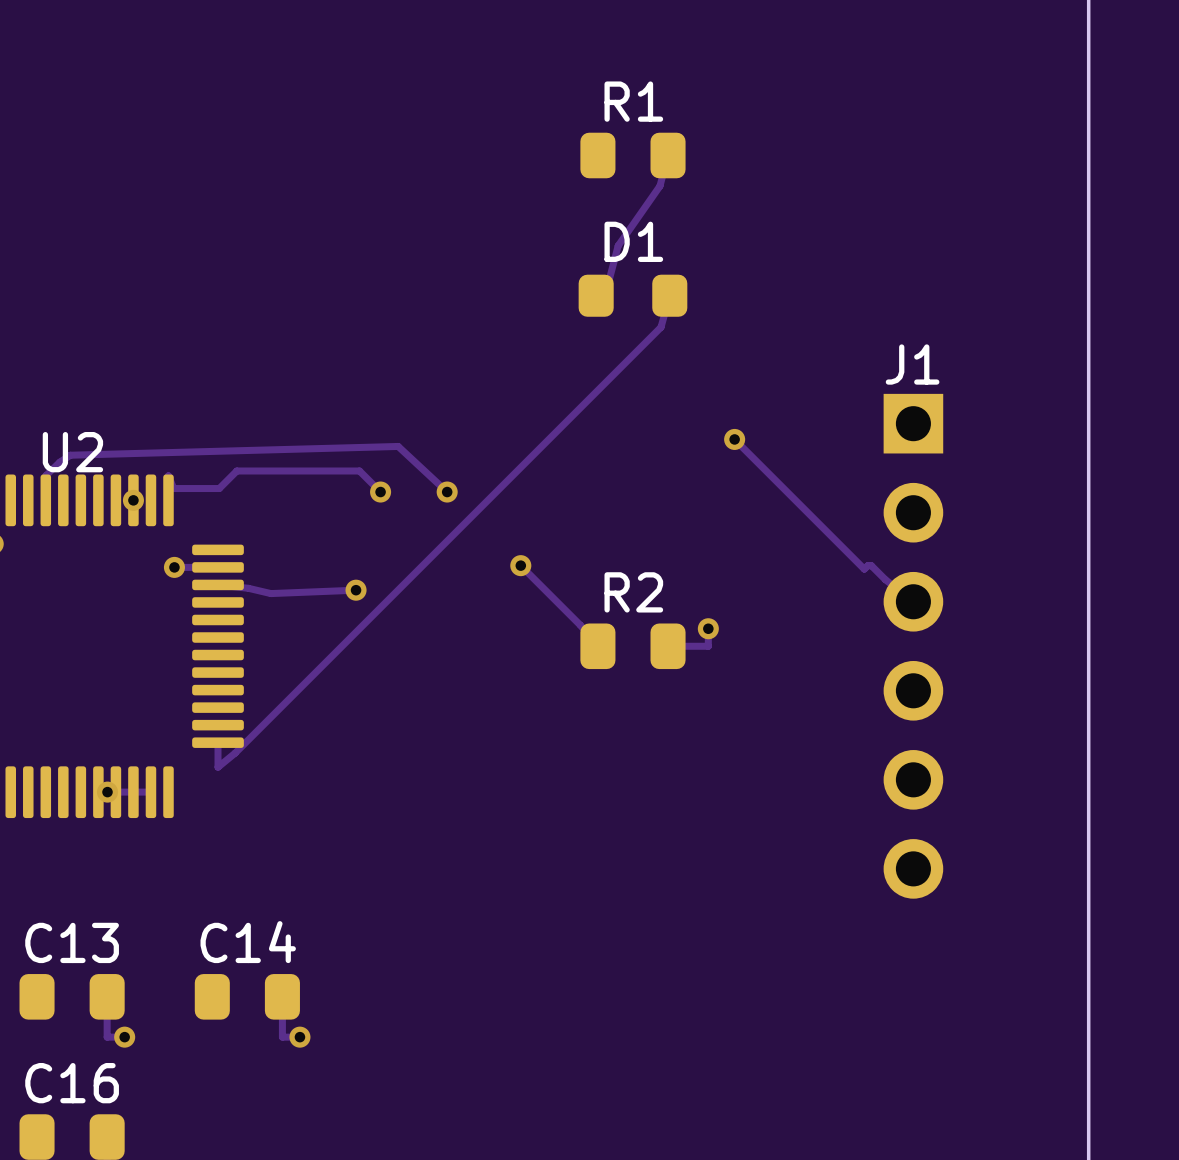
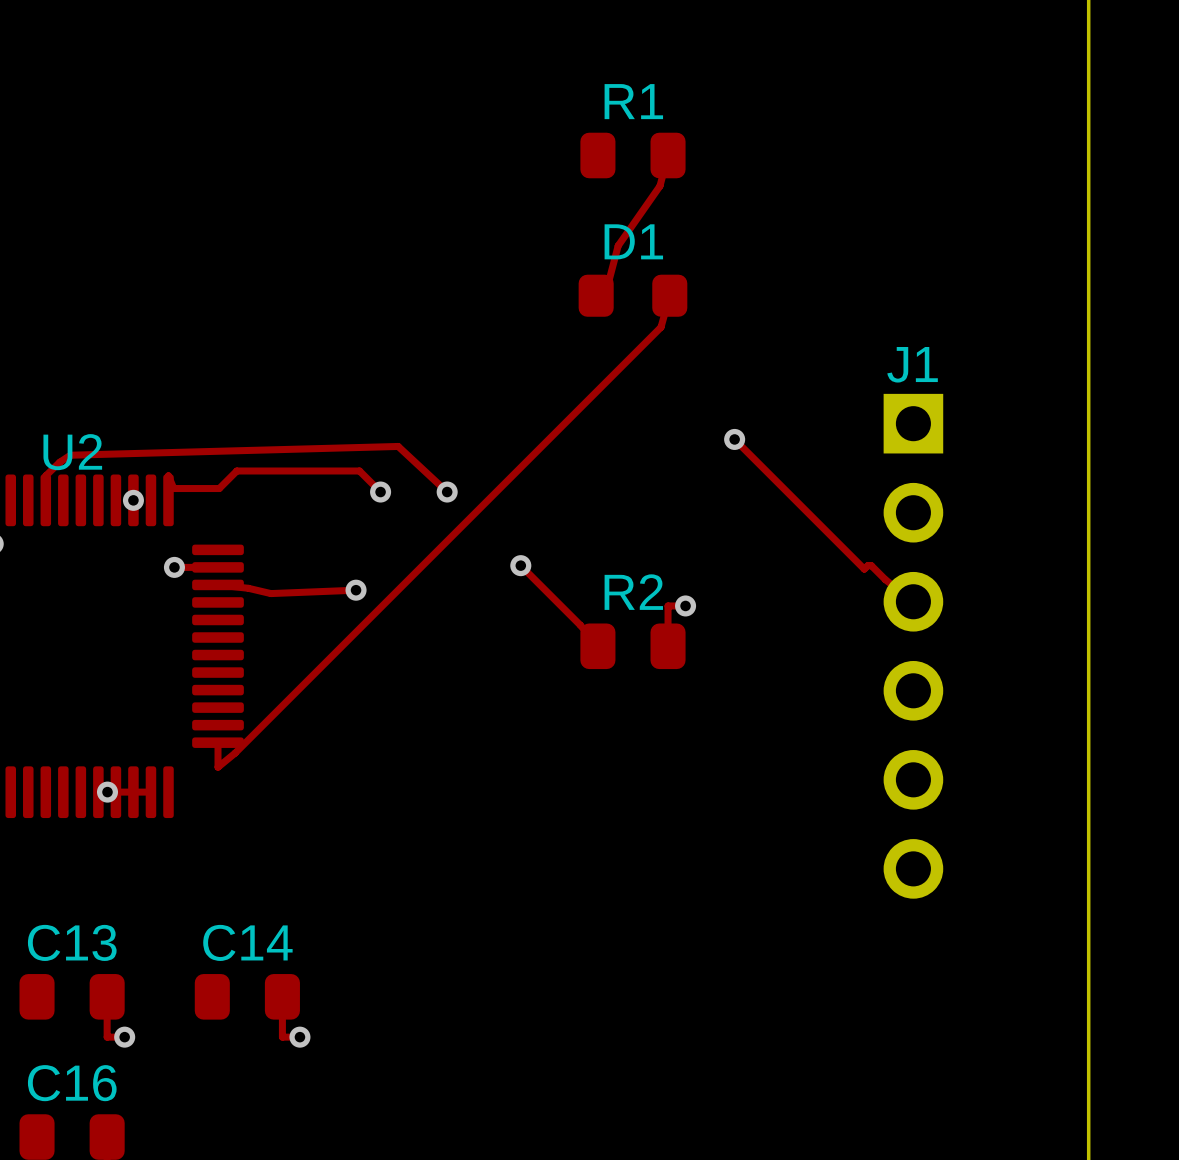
track: (708, 628) (708, 646) (668, 646) -> (685, 605) (668, 605) (668, 646)
via position: (708, 628) -> (685, 605)

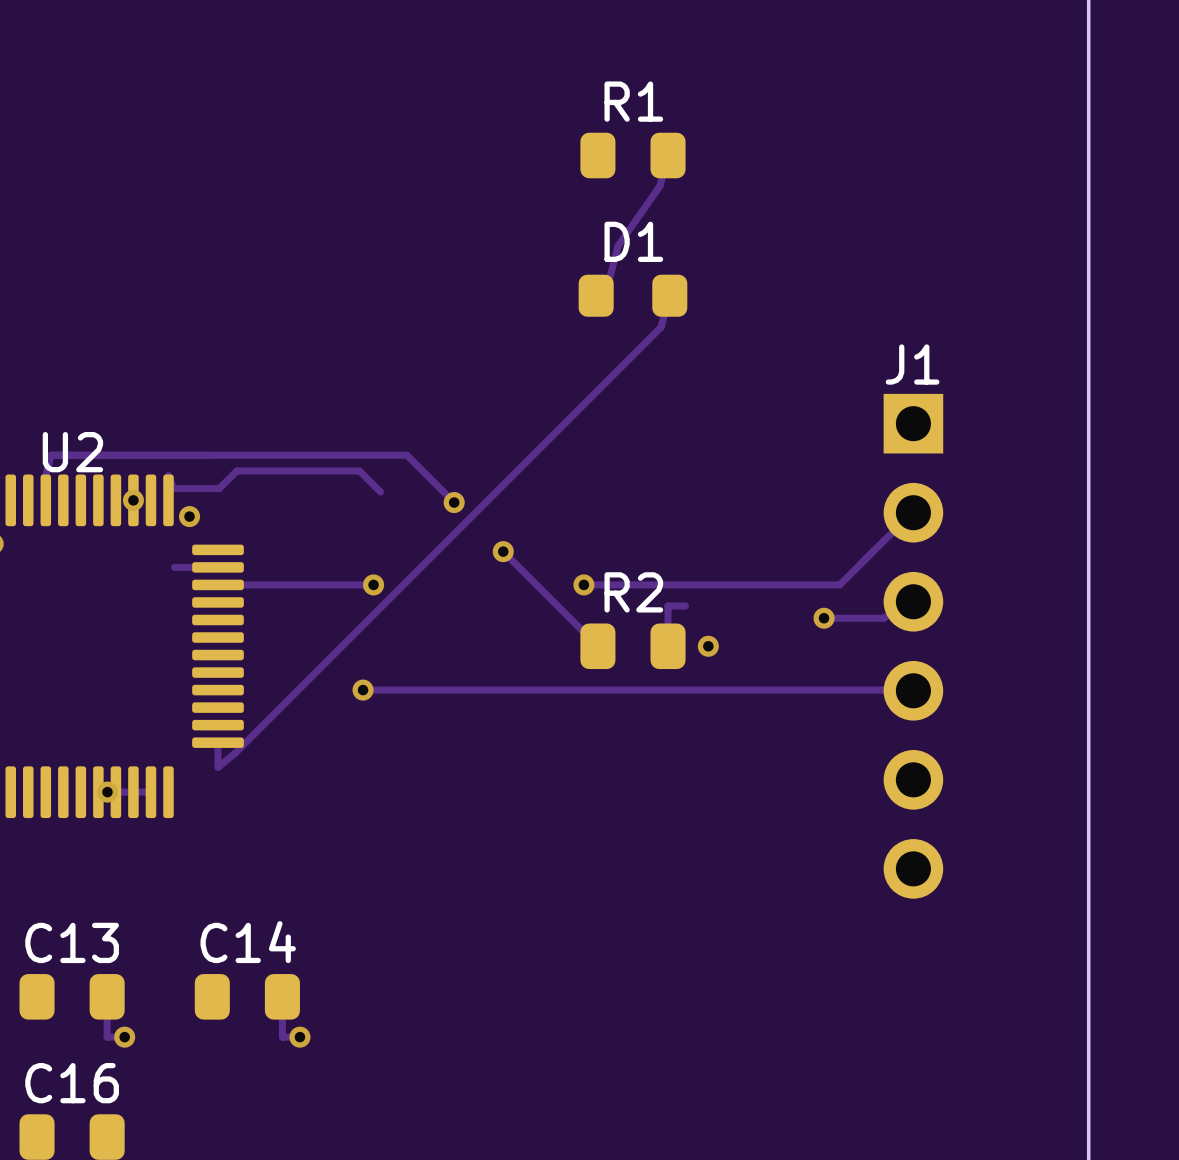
track: (734, 439) (864, 569) (867, 565) (871, 565) (885, 579) (913, 601) -> (824, 618) (883, 618) (913, 601)
via: (734, 439) -> none
track: (45, 475) (70, 455) (398, 446) (447, 492) -> (45, 475) (51, 455) (406, 455) (454, 502)
via: (380, 492) -> none
via position: (447, 492) -> (454, 502)
track: none -> (913, 512) (839, 584) (583, 584)
track: (520, 565) (580, 625) (597, 646) -> (503, 551) (597, 646)
via position: (520, 565) -> (503, 551)
via position: (174, 567) -> (189, 516)
track: (218, 584) (248, 588) (270, 593) (356, 590) -> (218, 584) (373, 584)
via: none -> (583, 584)
via position: (356, 590) -> (373, 584)
via position: (685, 605) -> (708, 646)
via: none -> (824, 618)
track: none -> (363, 690) (913, 690)
via: none -> (363, 690)

